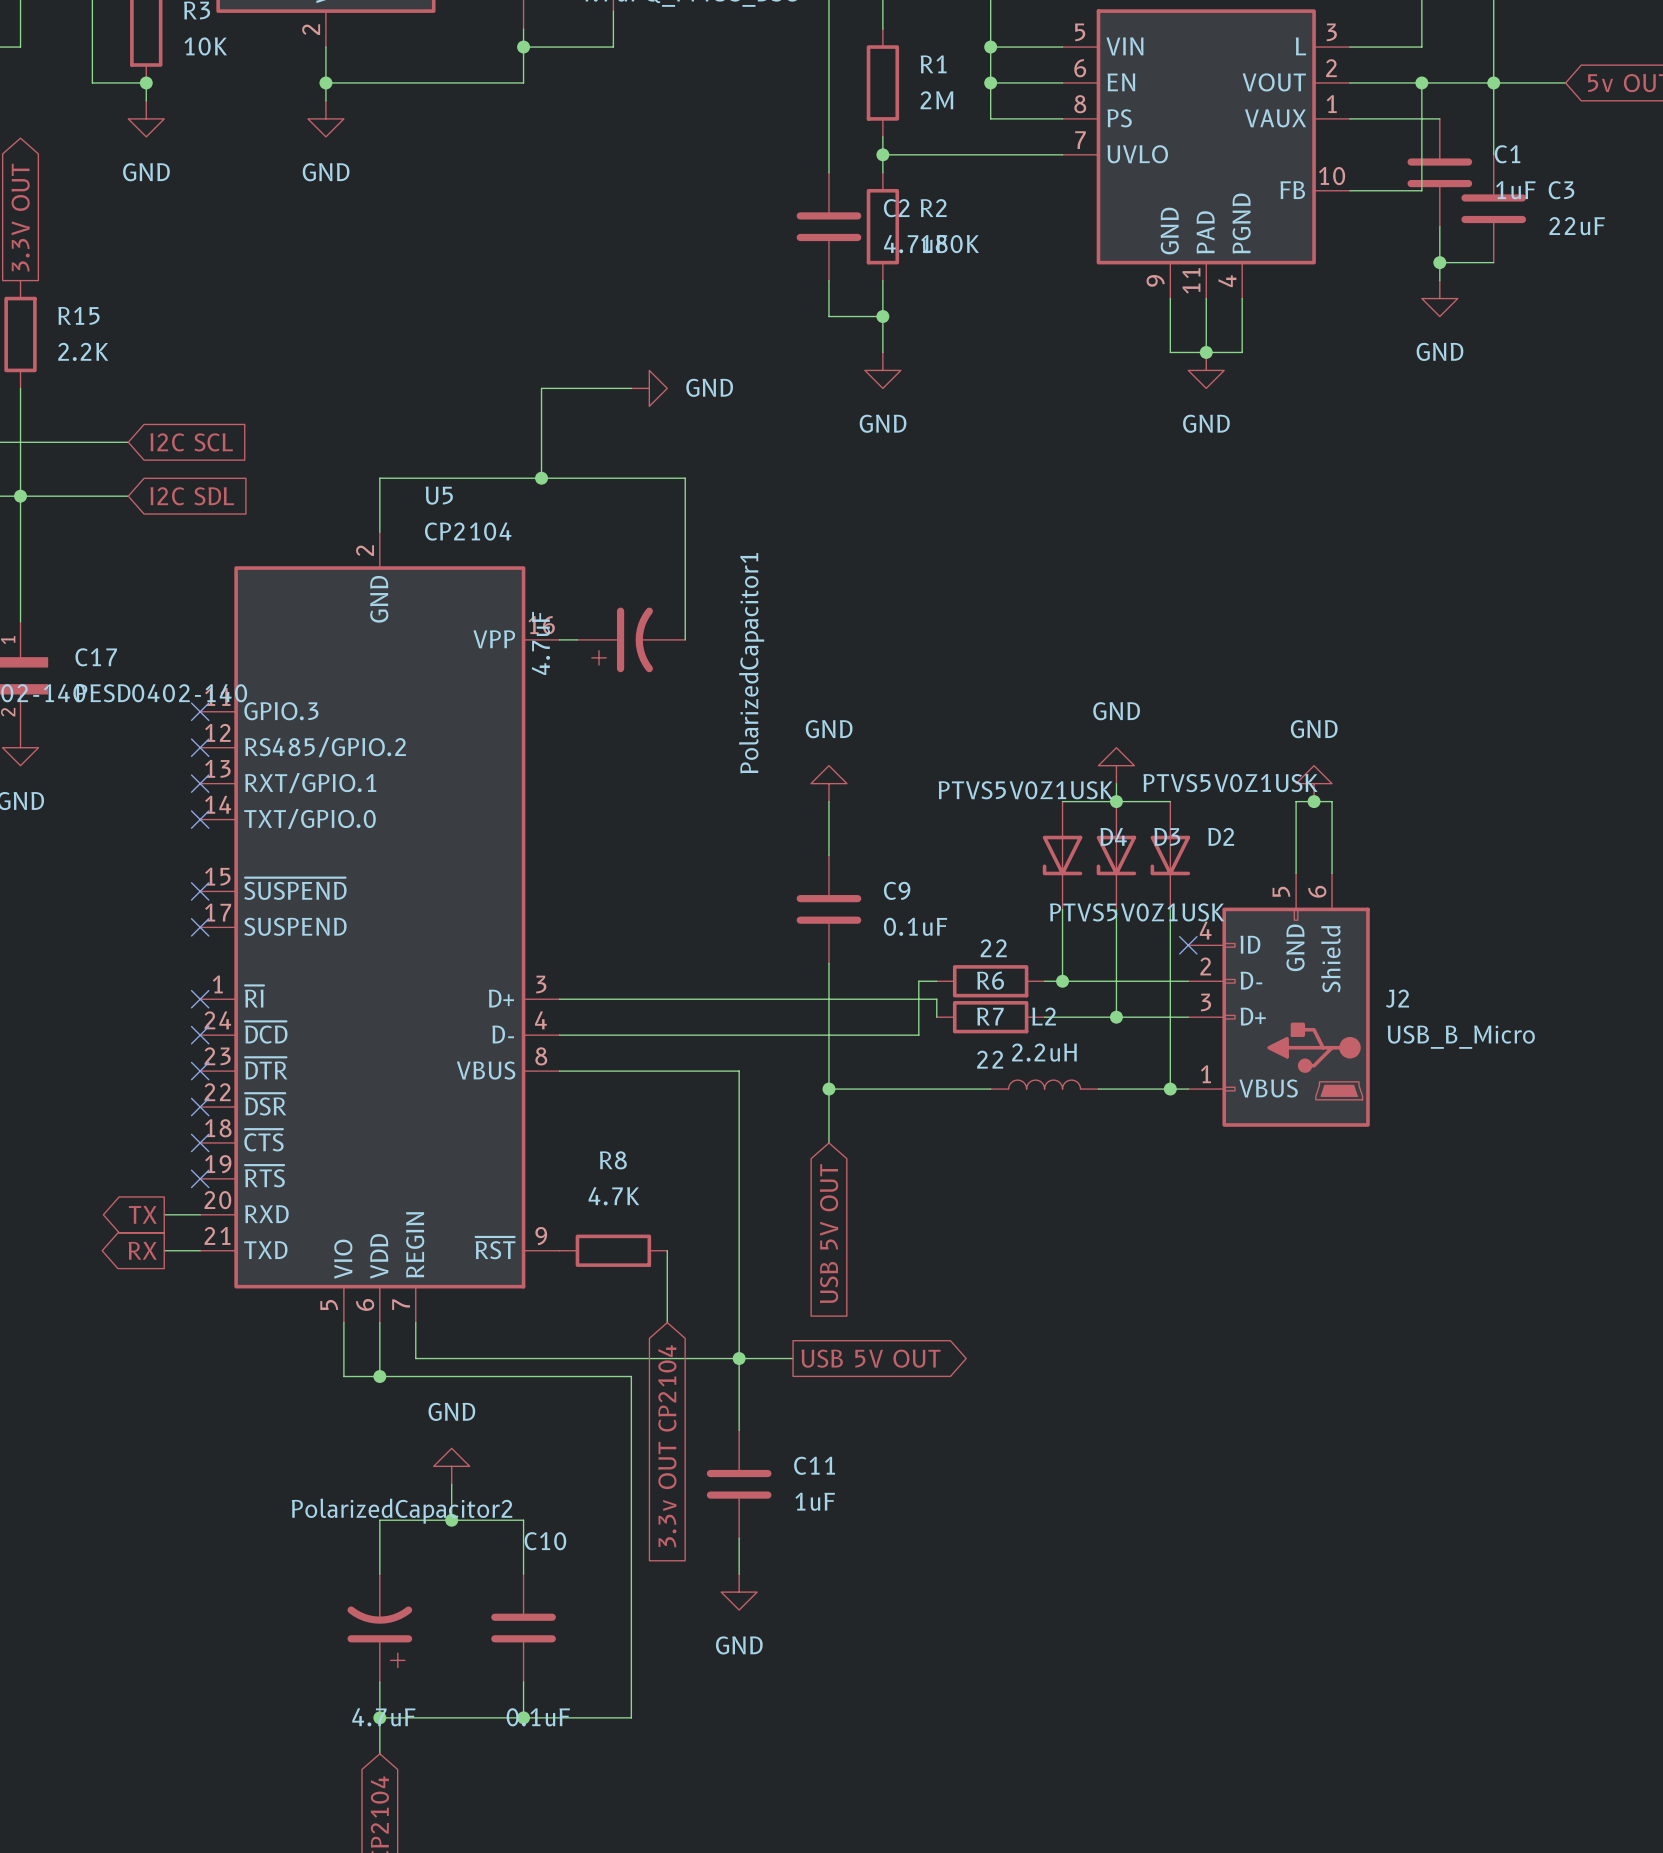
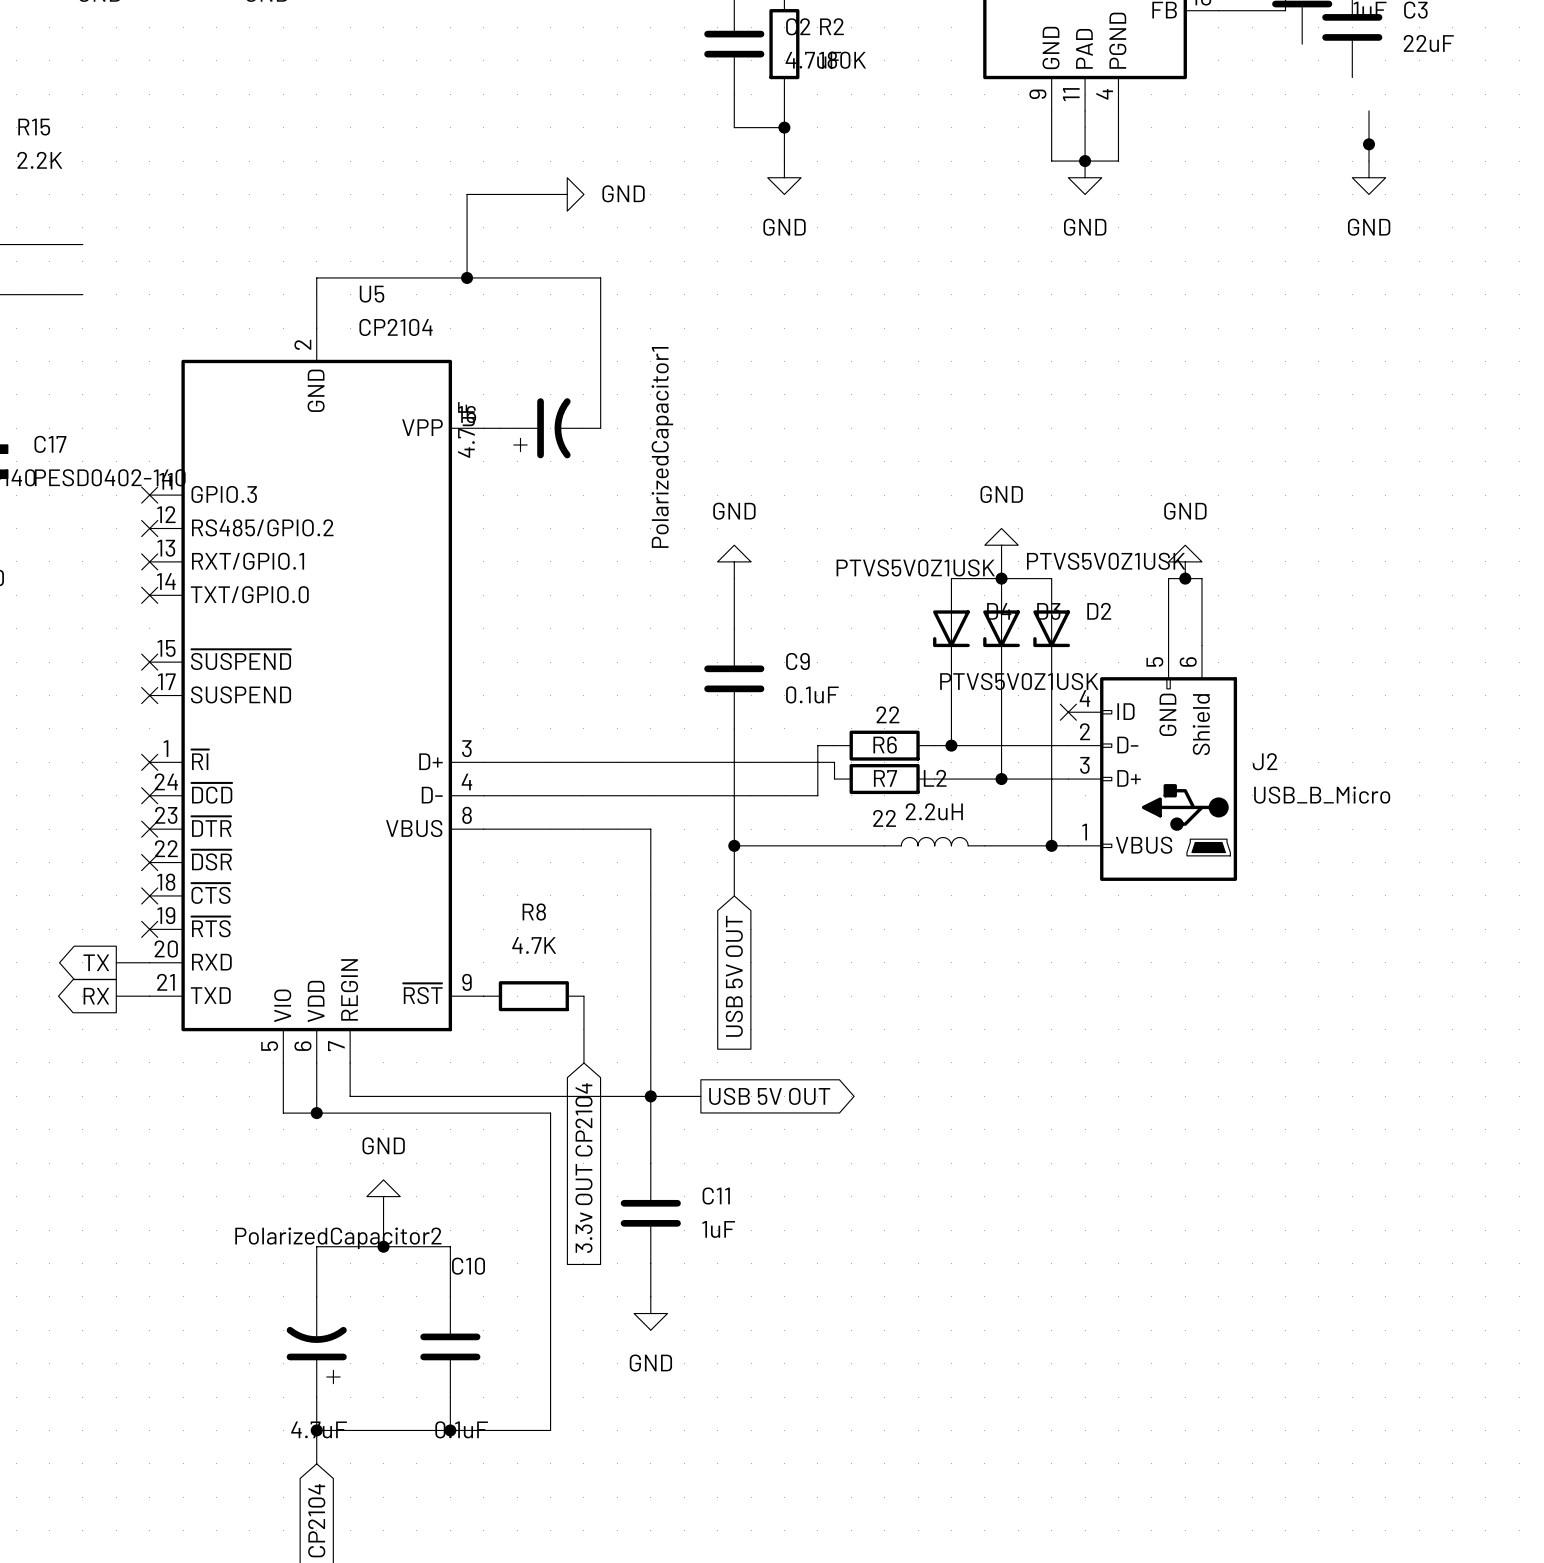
wire: (1439, 226) (1439, 280) -> (1369, 110) (1369, 161)
wire: (1439, 262) (1493, 262) -> none
junction: (1439, 262) -> none
power symbol position: GND (1439, 298) -> GND (1369, 177)
junction: none -> (1369, 144)
global label: I2C SCL (191, 442) -> none
global label: I2C SDL (192, 496) -> none

